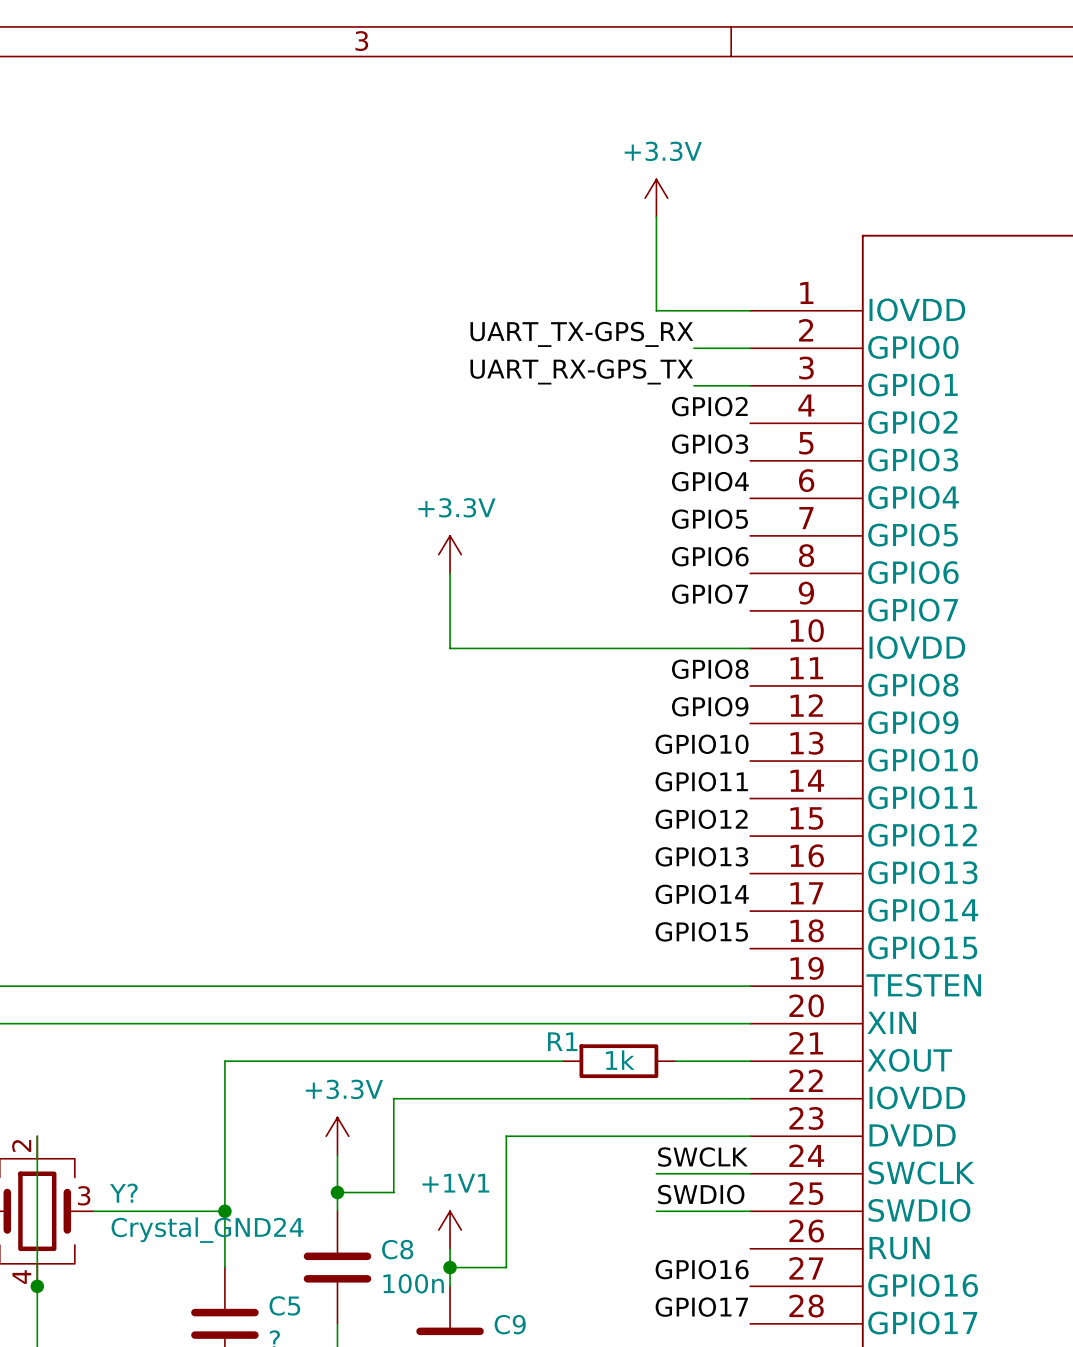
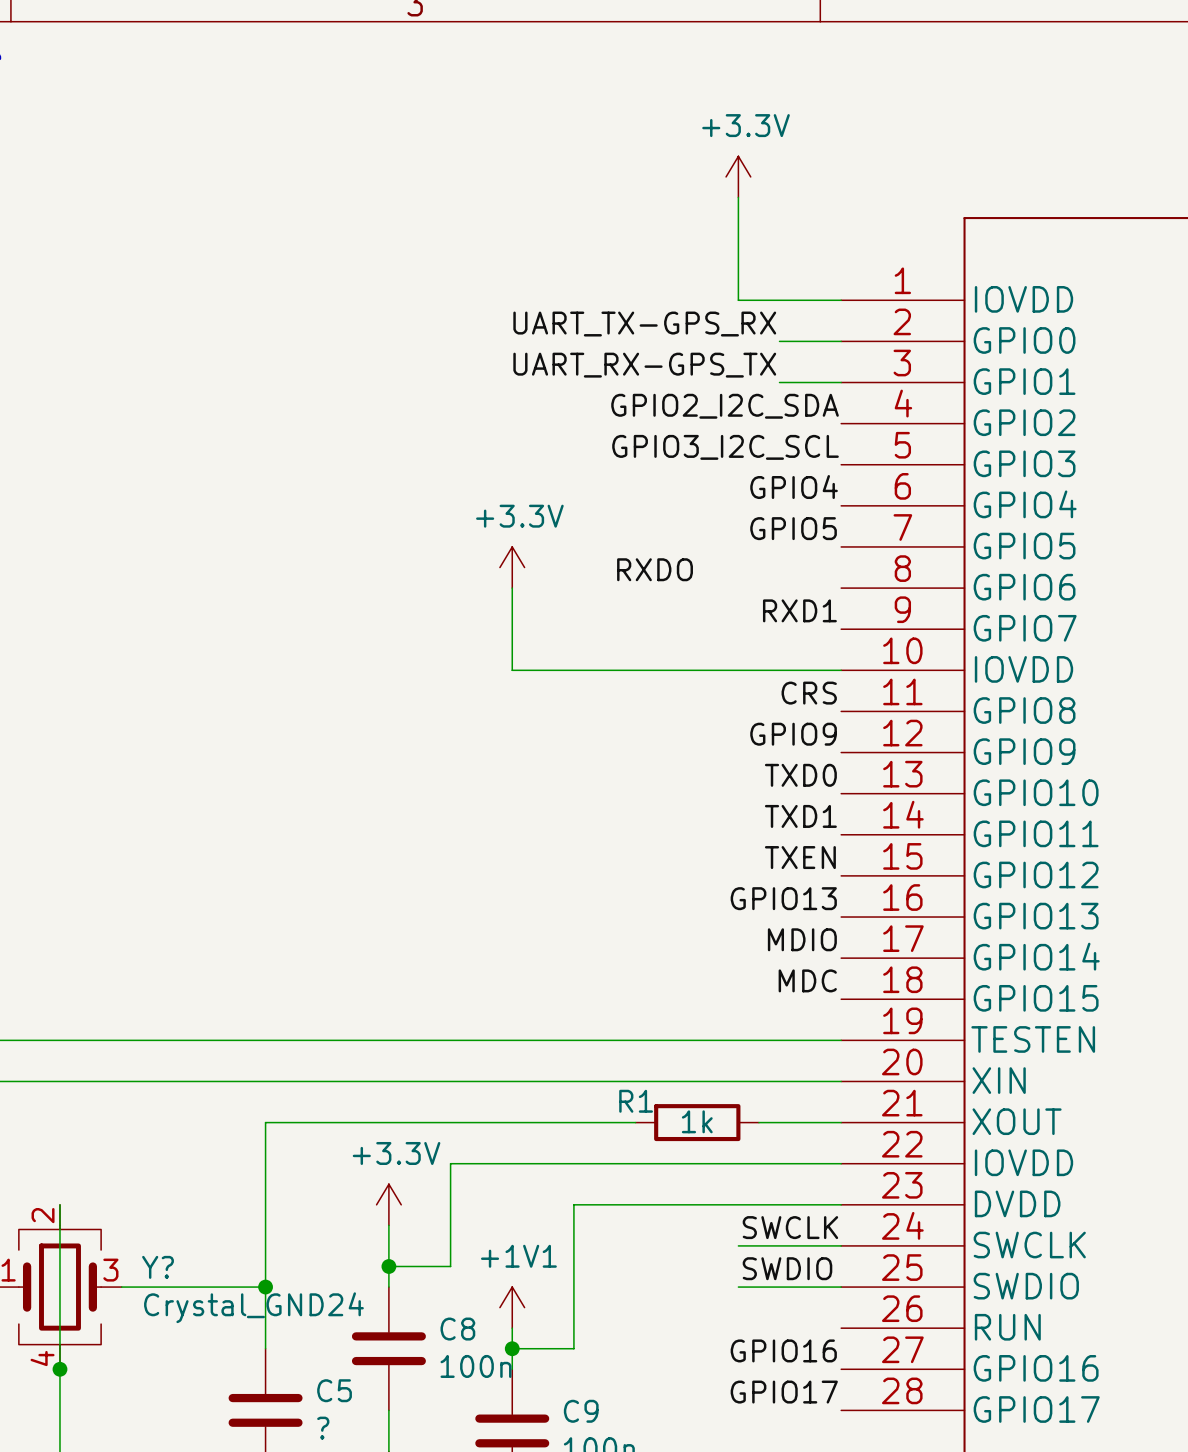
label: GPIO2 (709, 406) -> GPIO2_I2C_SDA (725, 406)
label: GPIO3 (710, 444) -> GPIO3_I2C_SCL (725, 447)
label: none -> RXDO (655, 569)
label: GPIO6 (710, 556) -> none
label: GPIO7 (710, 594) -> RXD1 (799, 610)
label: GPIO8 (710, 669) -> CRS (809, 693)
label: GPIO10 (702, 744) -> TXD0 (800, 775)
label: GPIO11 (701, 781) -> TXD1 (800, 816)
label: GPIO12 (701, 819) -> TXEN (800, 857)
label: GPIO14 (702, 894) -> MDIO (802, 939)
label: GPIO15 (701, 931) -> MDC (807, 980)

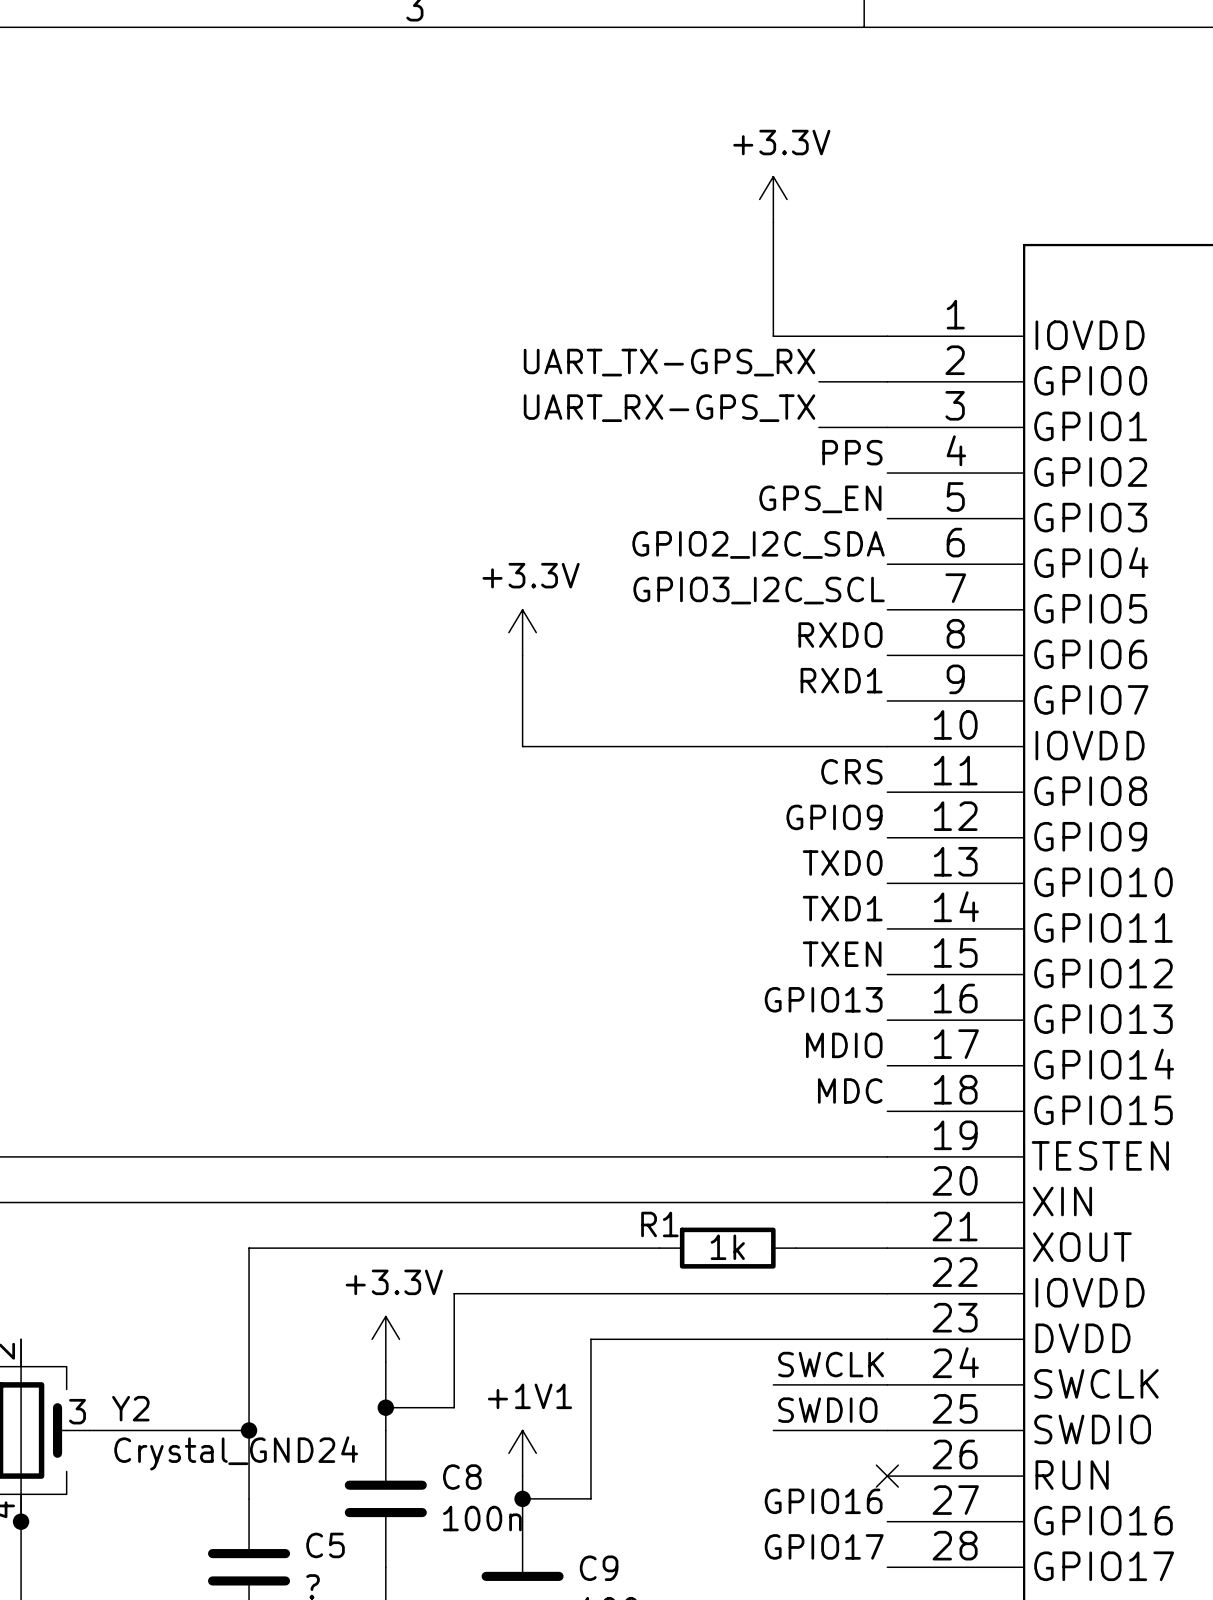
label: GPIO2_I2C_SDA (725, 406) -> PPS (852, 452)
label: GPIO3_I2C_SCL (725, 447) -> GPS_EN (820, 499)
label: GPIO4 (794, 487) -> GPIO2_I2C_SDA (758, 544)
label: GPIO5 (793, 528) -> GPIO3_I2C_SCL (759, 590)
label position: RXDO (655, 569) -> RXDO (840, 635)
Y? name: Y? (158, 1267) -> Y2 (130, 1408)
no-connect mark: none -> (887, 1476)

